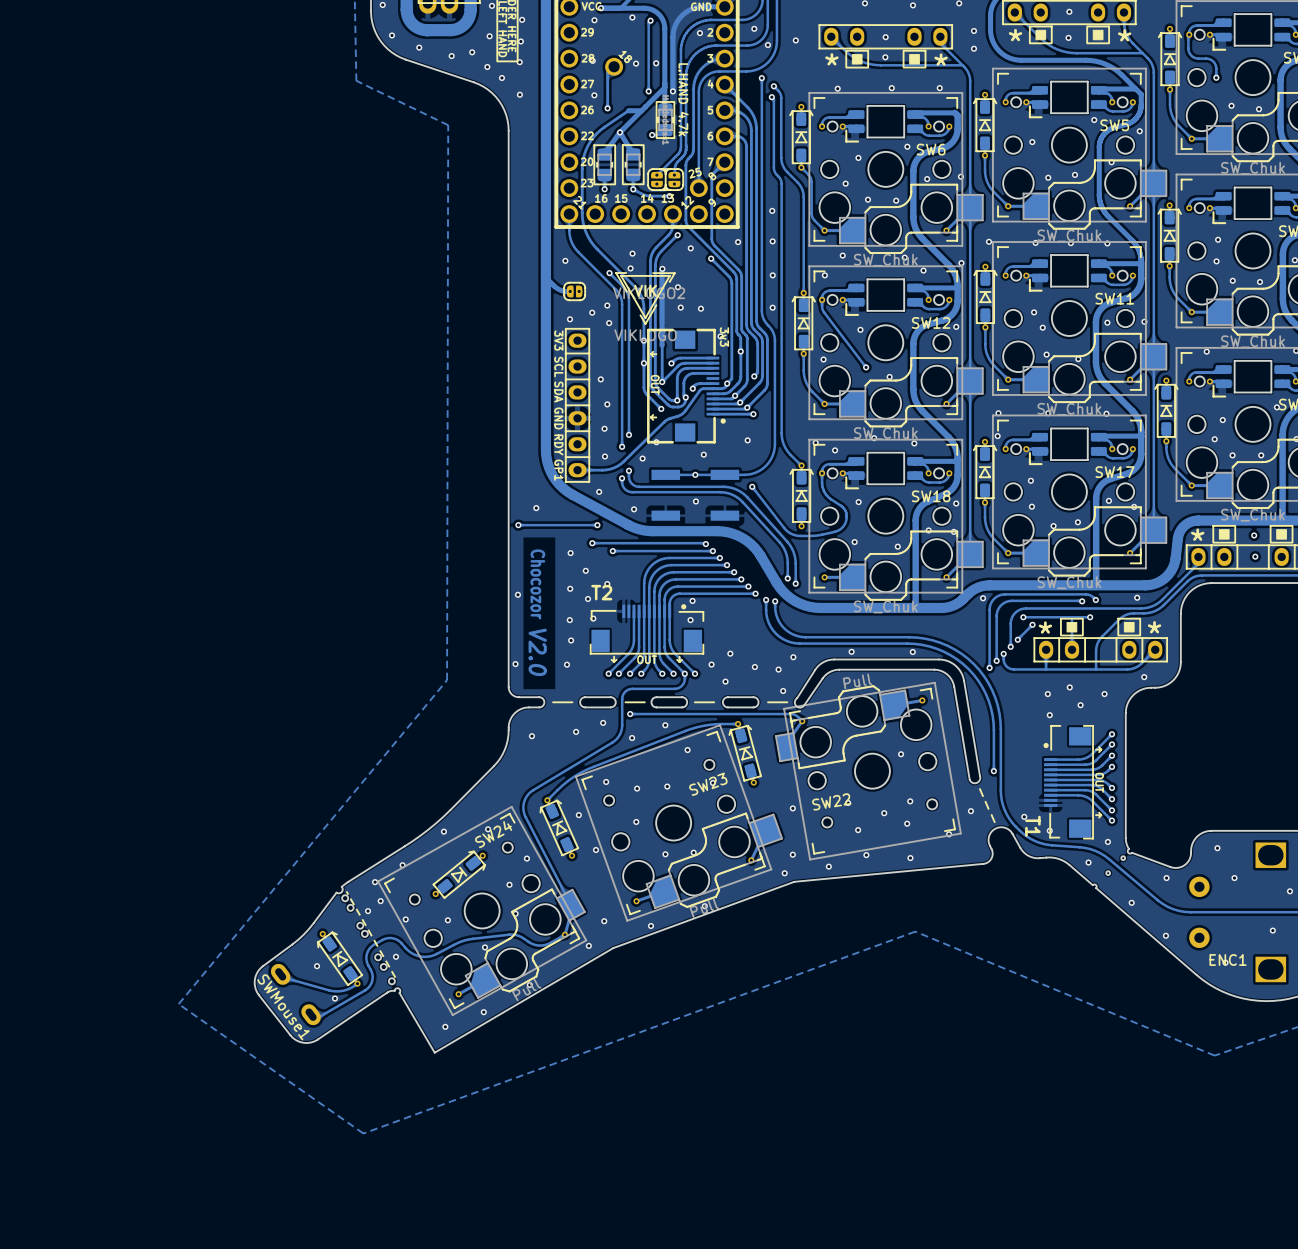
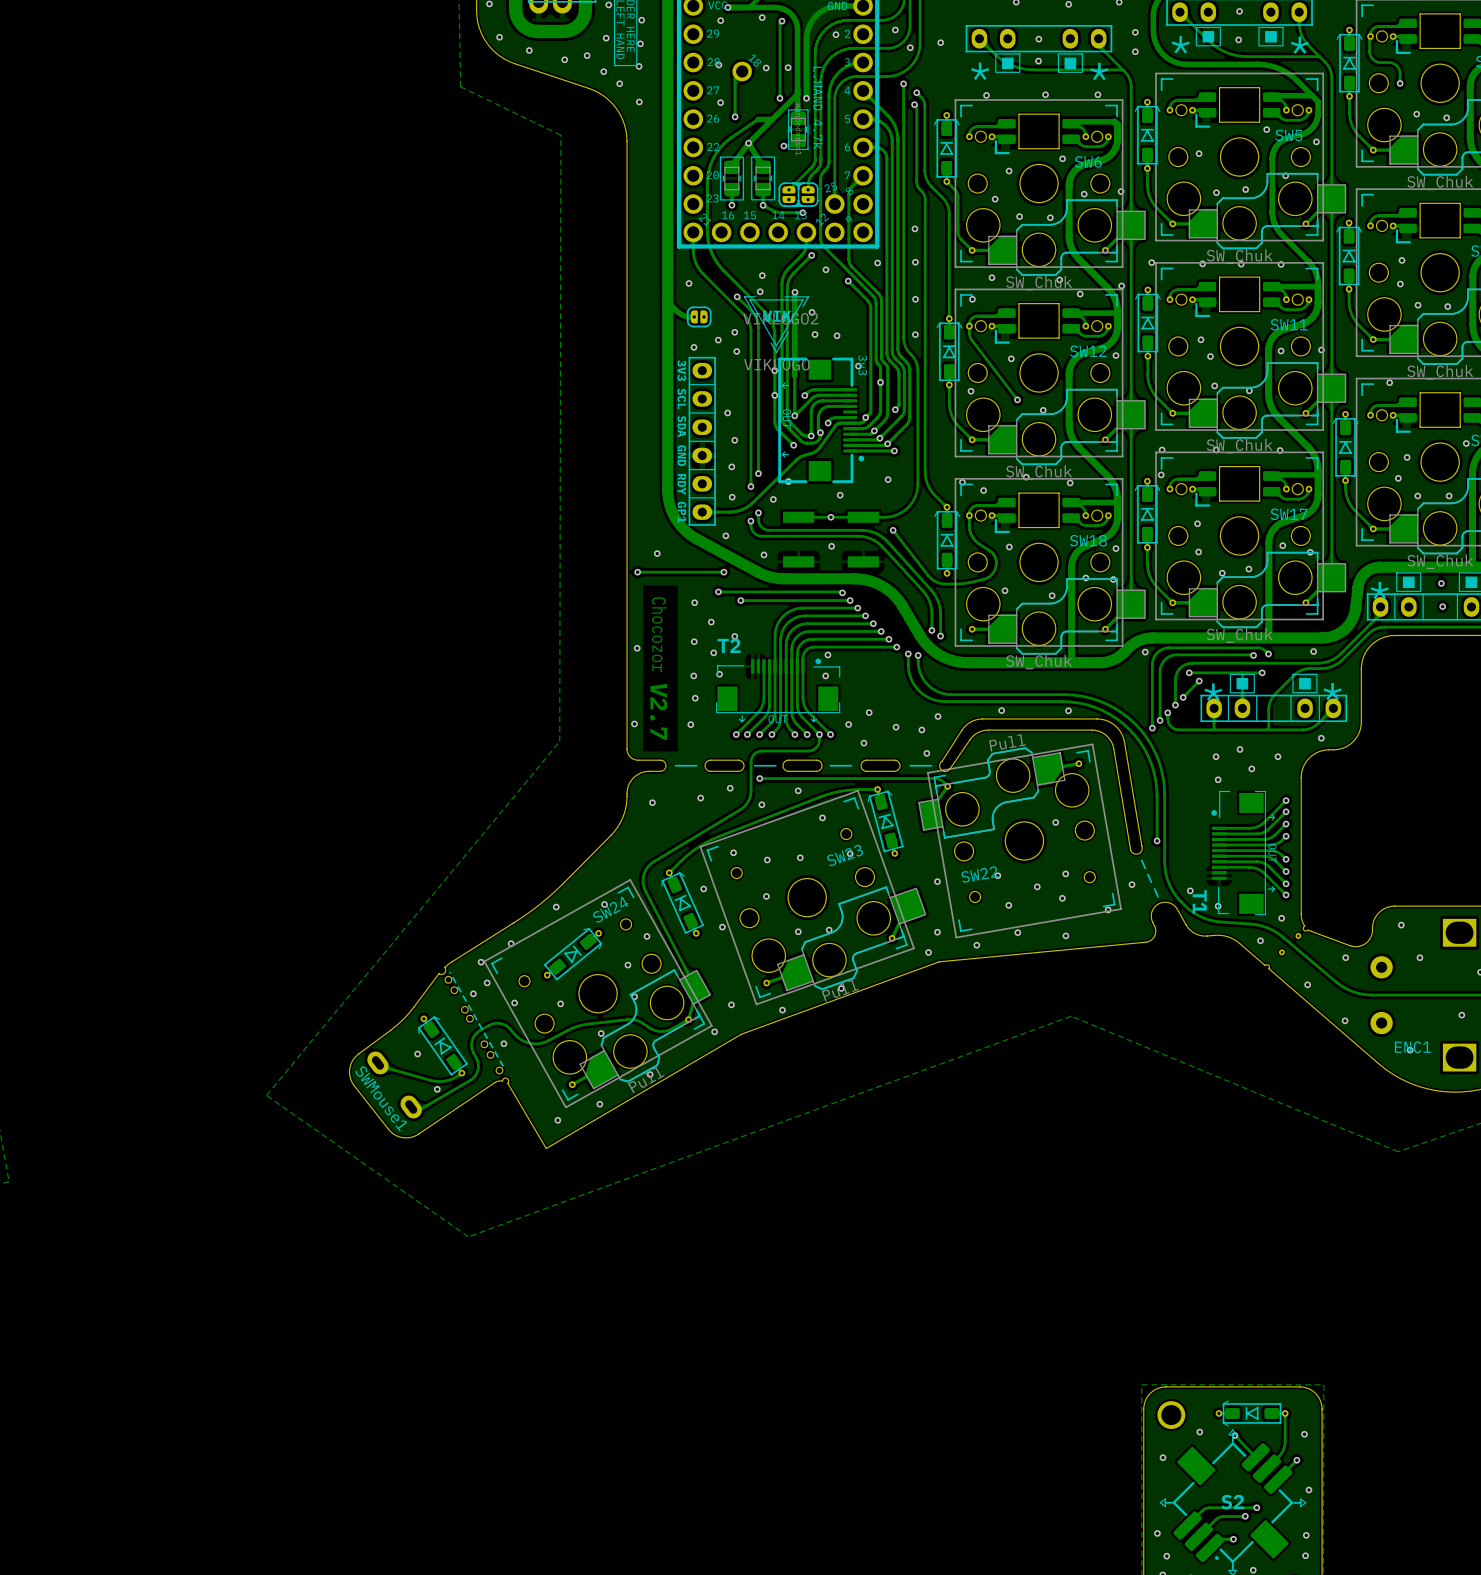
text: V2.0 (537, 652) -> V2.7 (658, 711)

